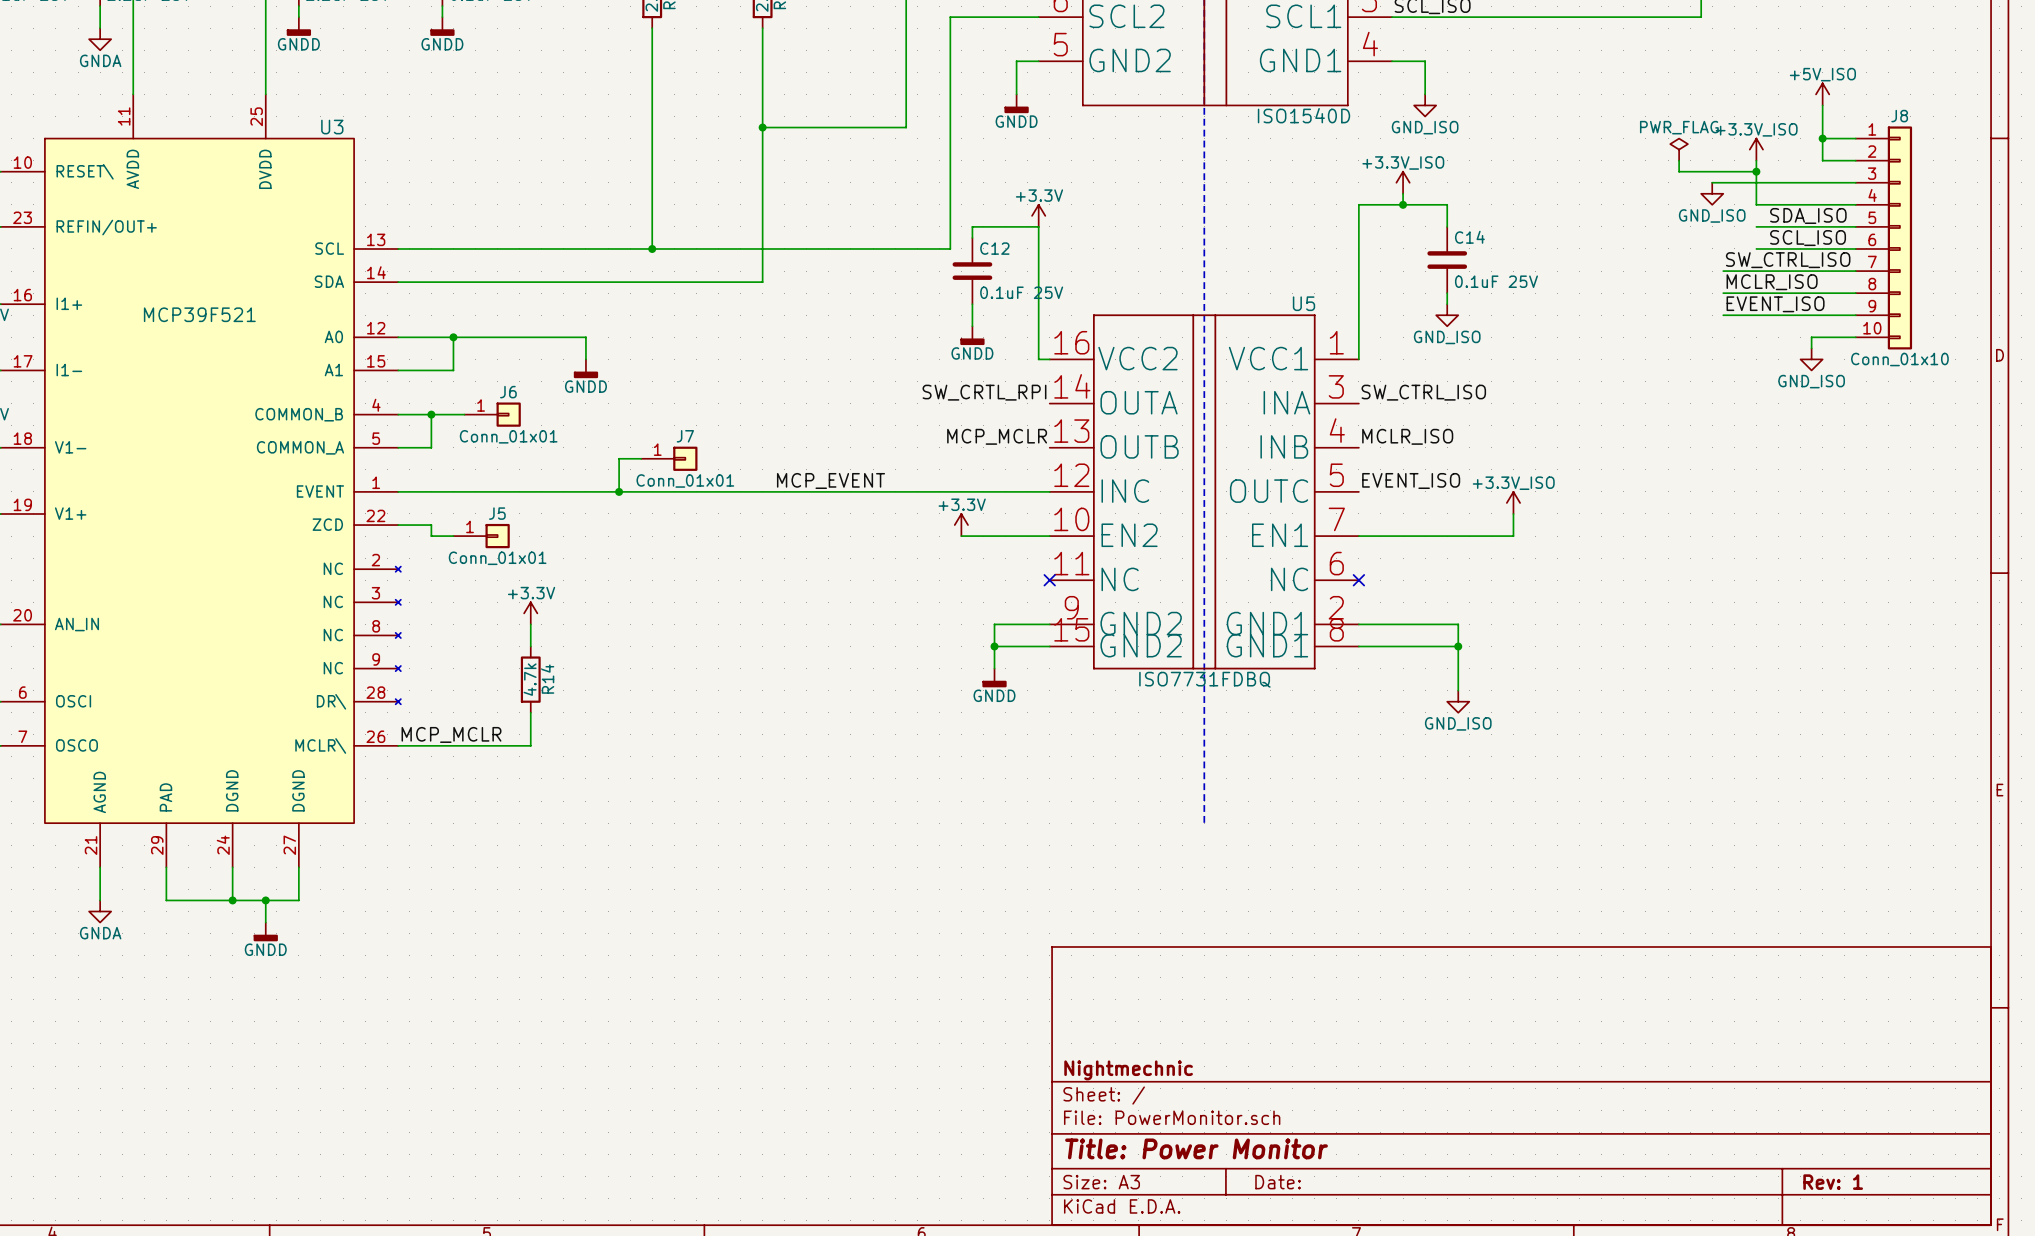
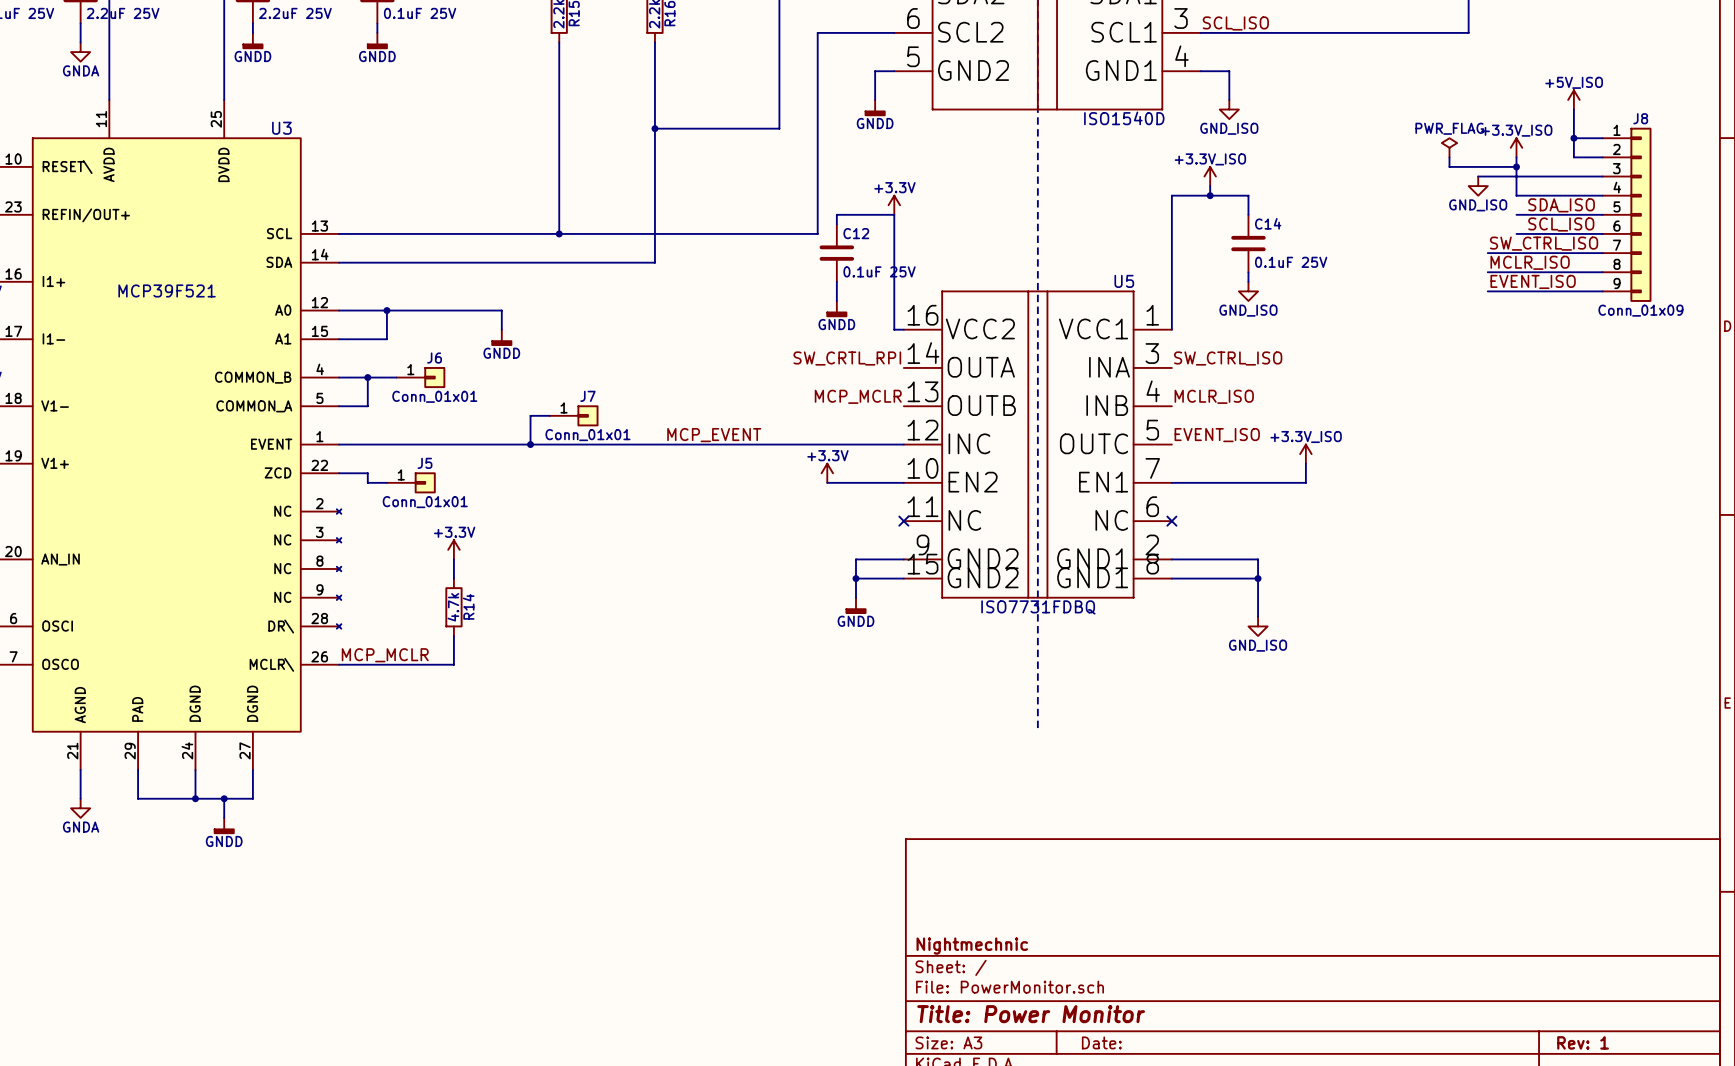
J8 symbol: [1855, 126, 1913, 350] -> [1602, 127, 1652, 302]
wire: (1855, 337) (1811, 337) (1811, 348) -> none
power symbol: GND_ISO (1811, 359) -> none
J8 value: Conn_01x10 (1899, 359) -> Conn_01x09 (1640, 310)

